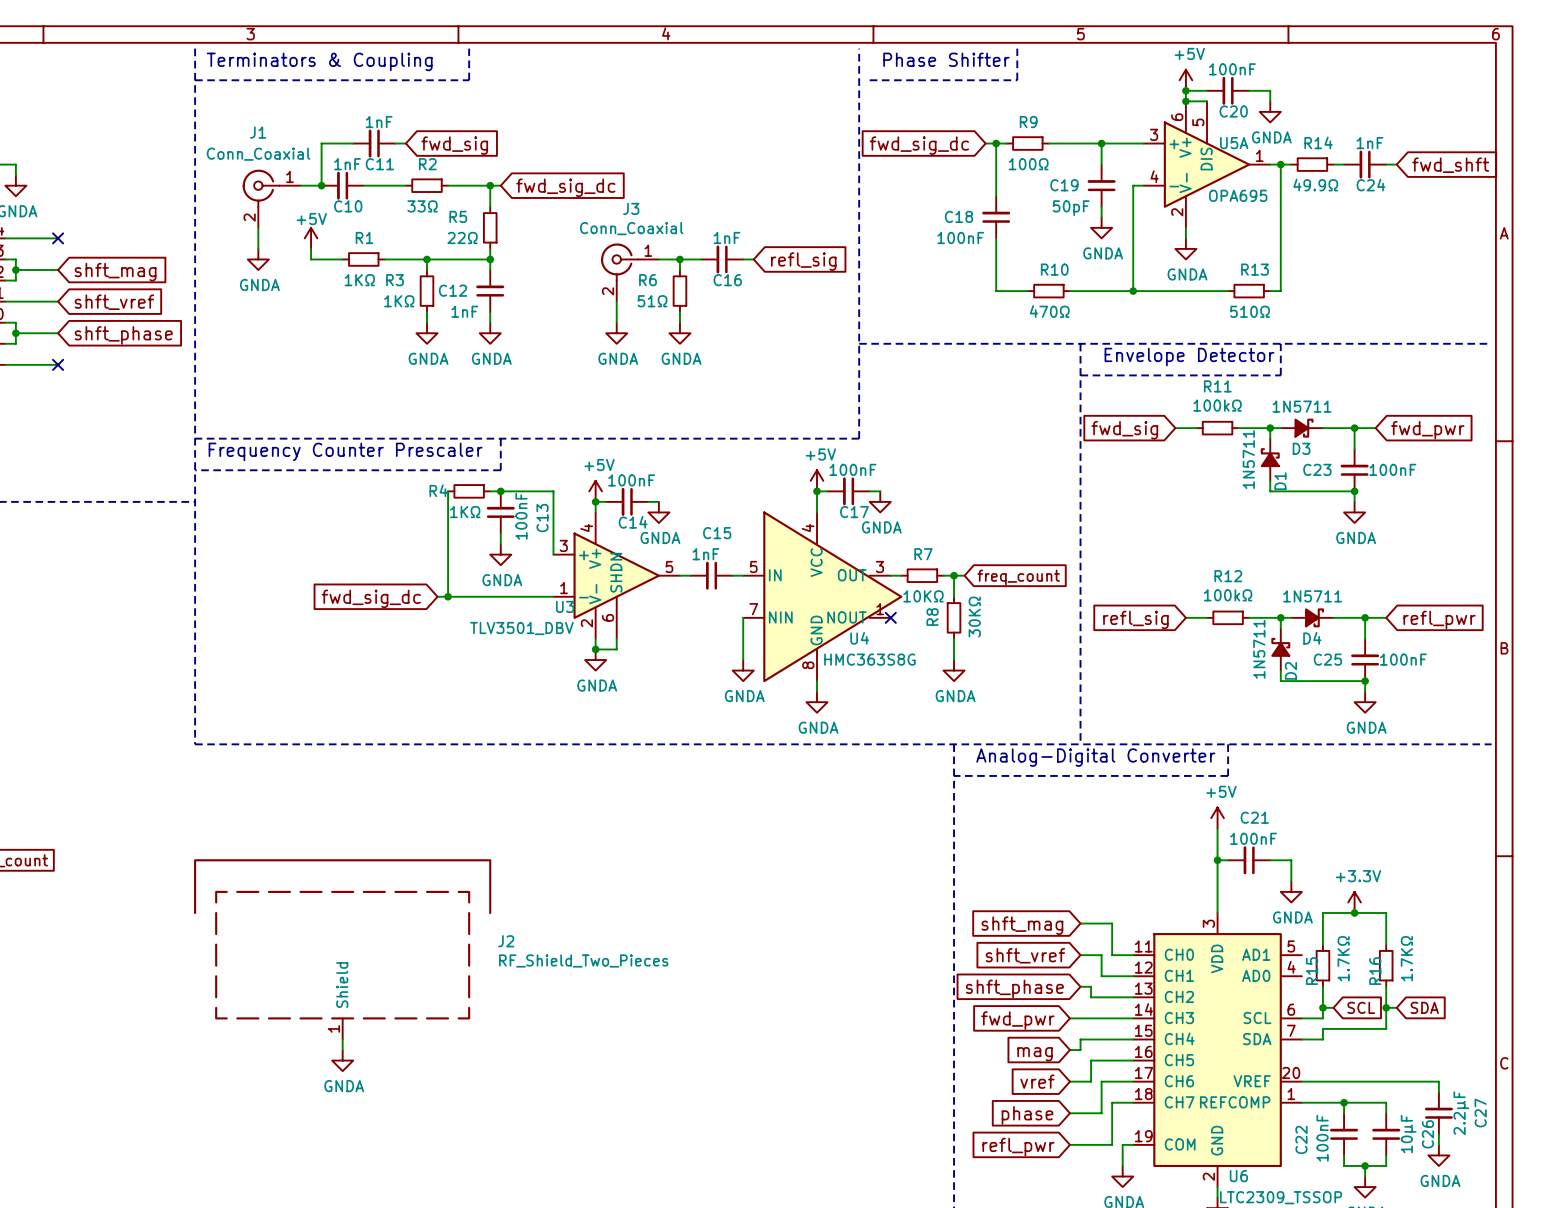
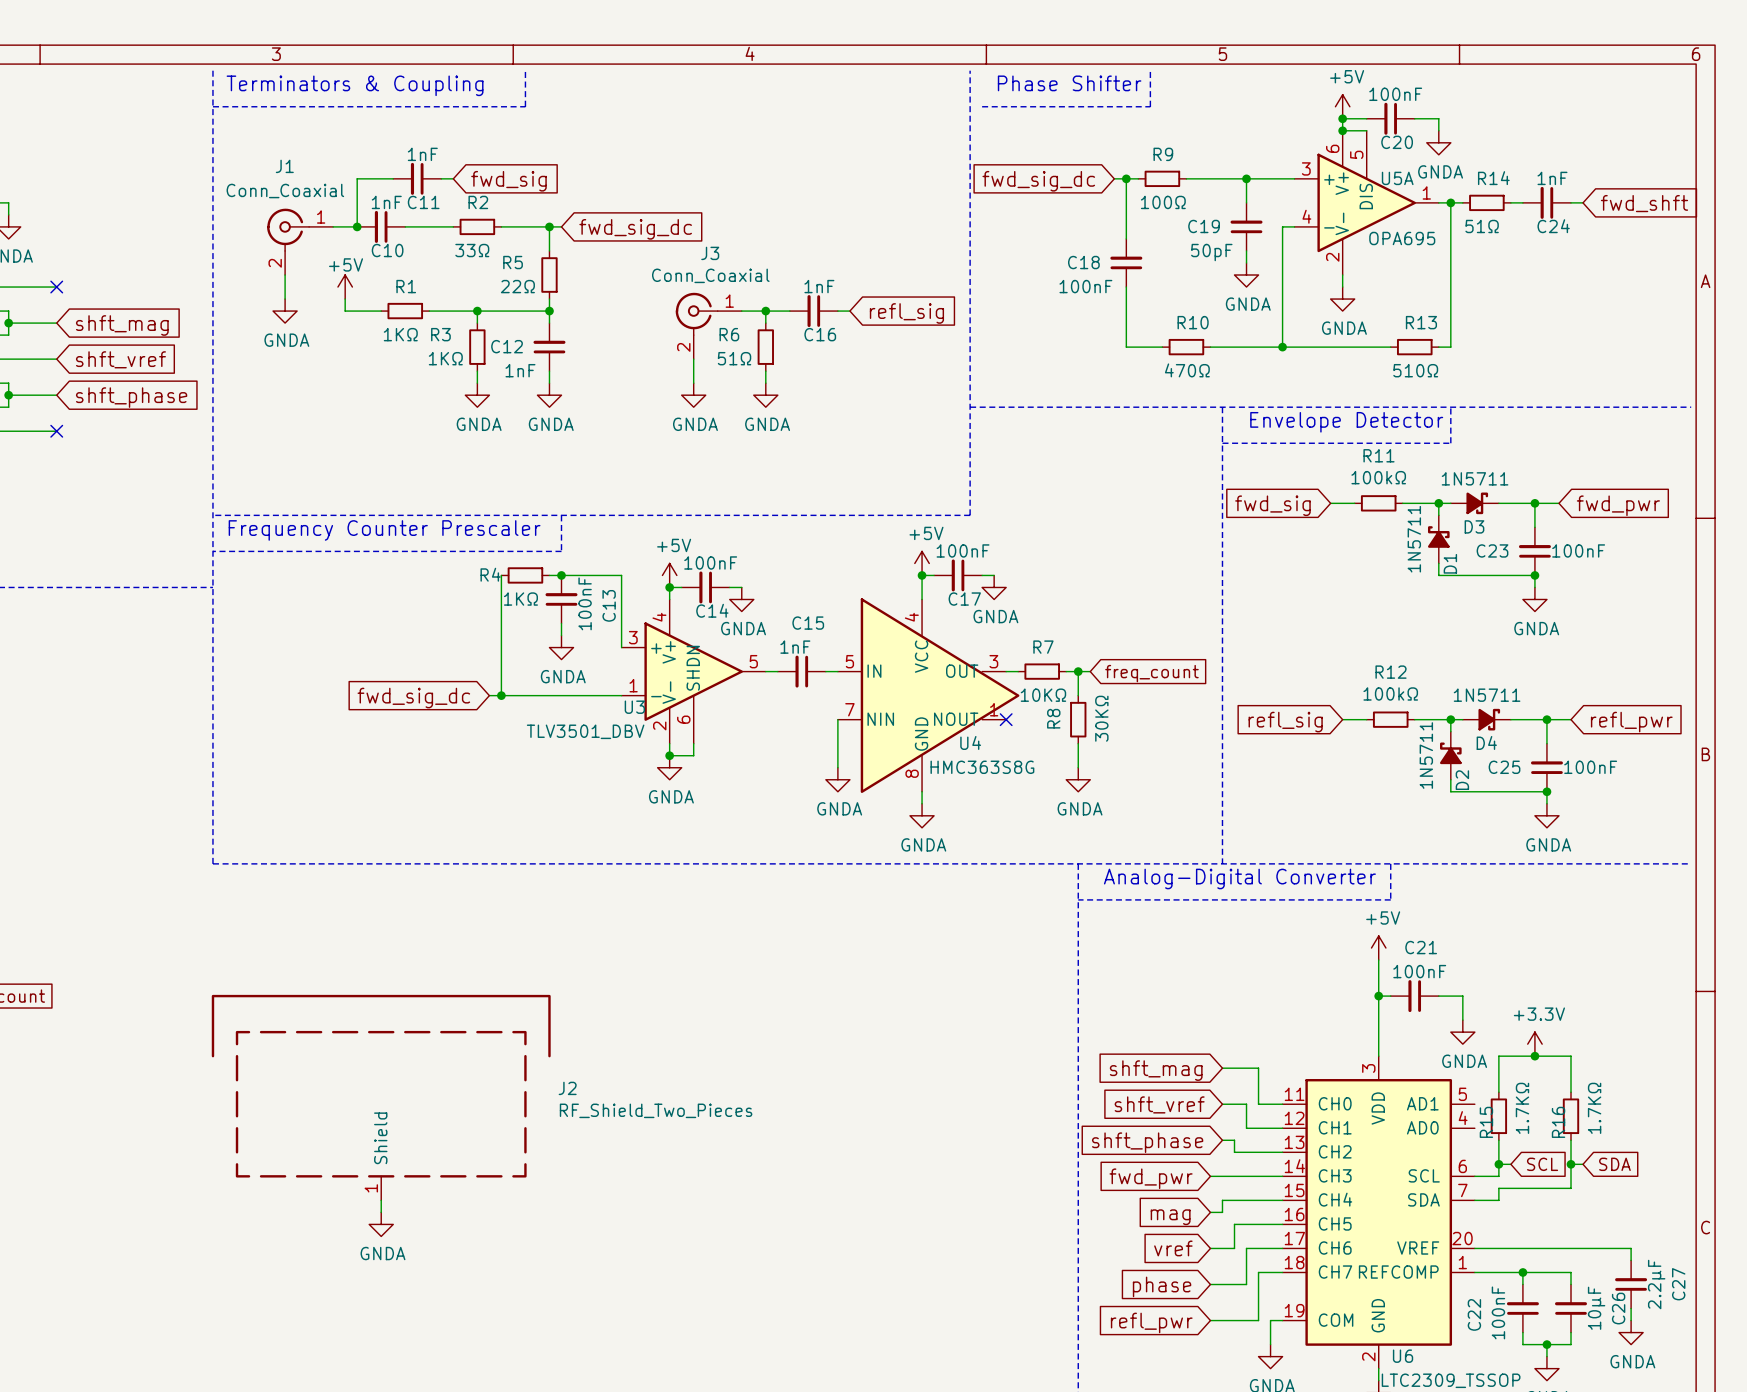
R14 value: 49.9Ω (1315, 185) -> 51Ω (1482, 226)

